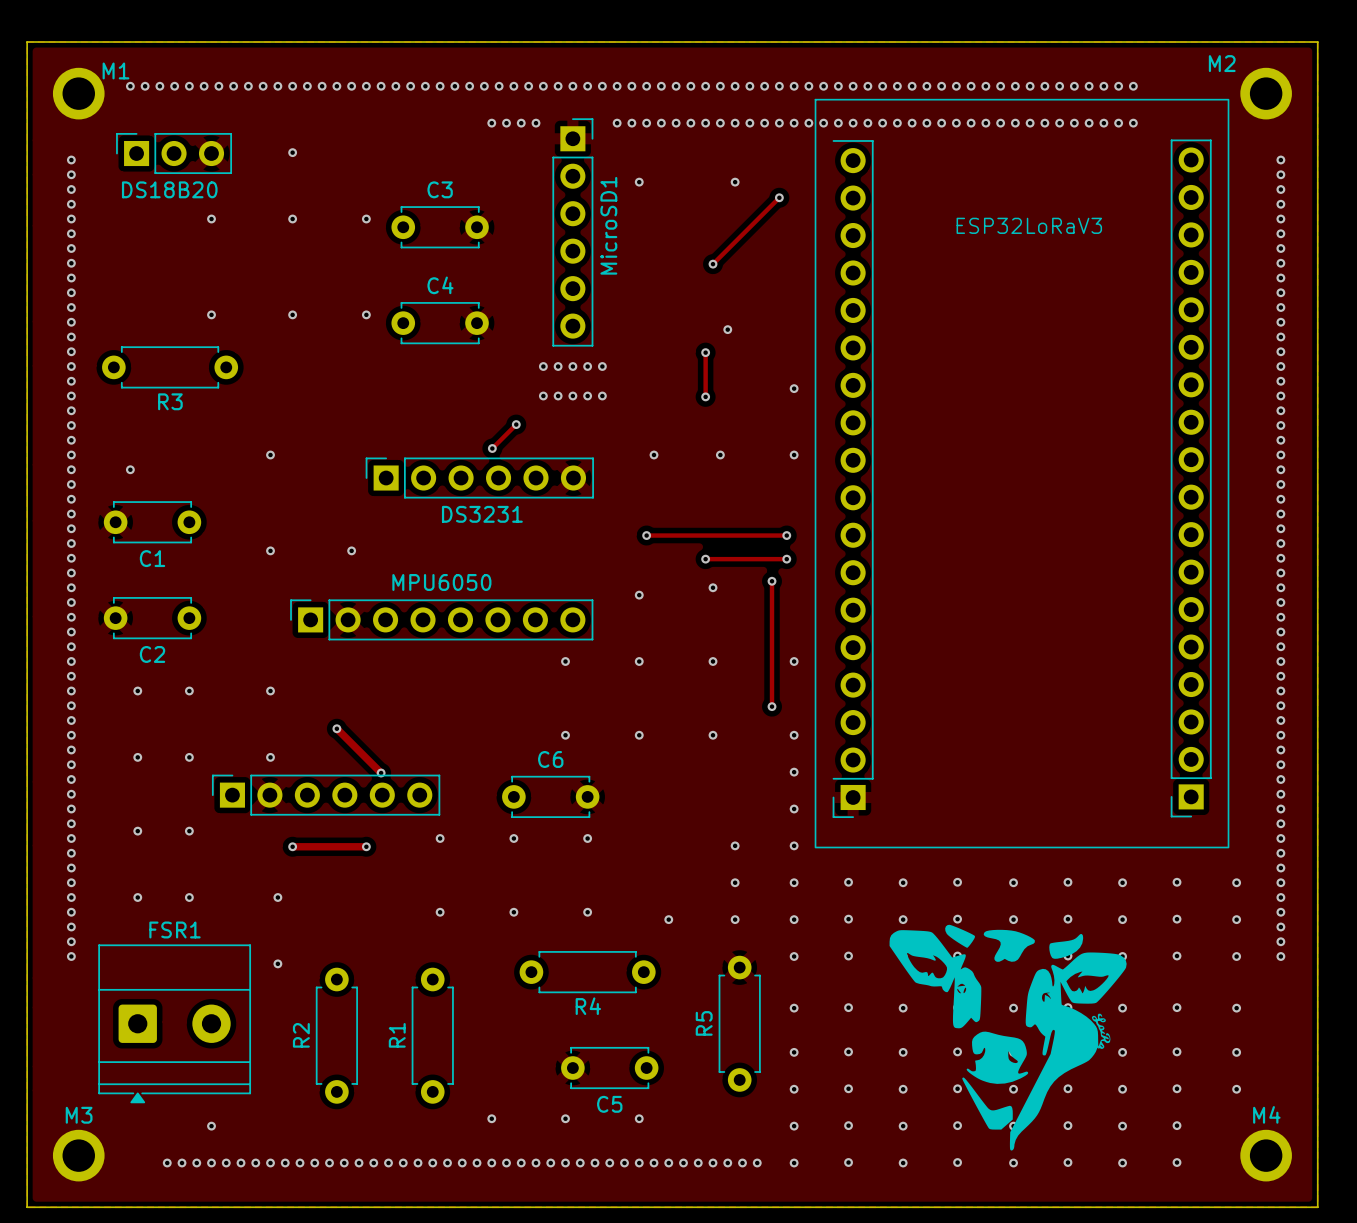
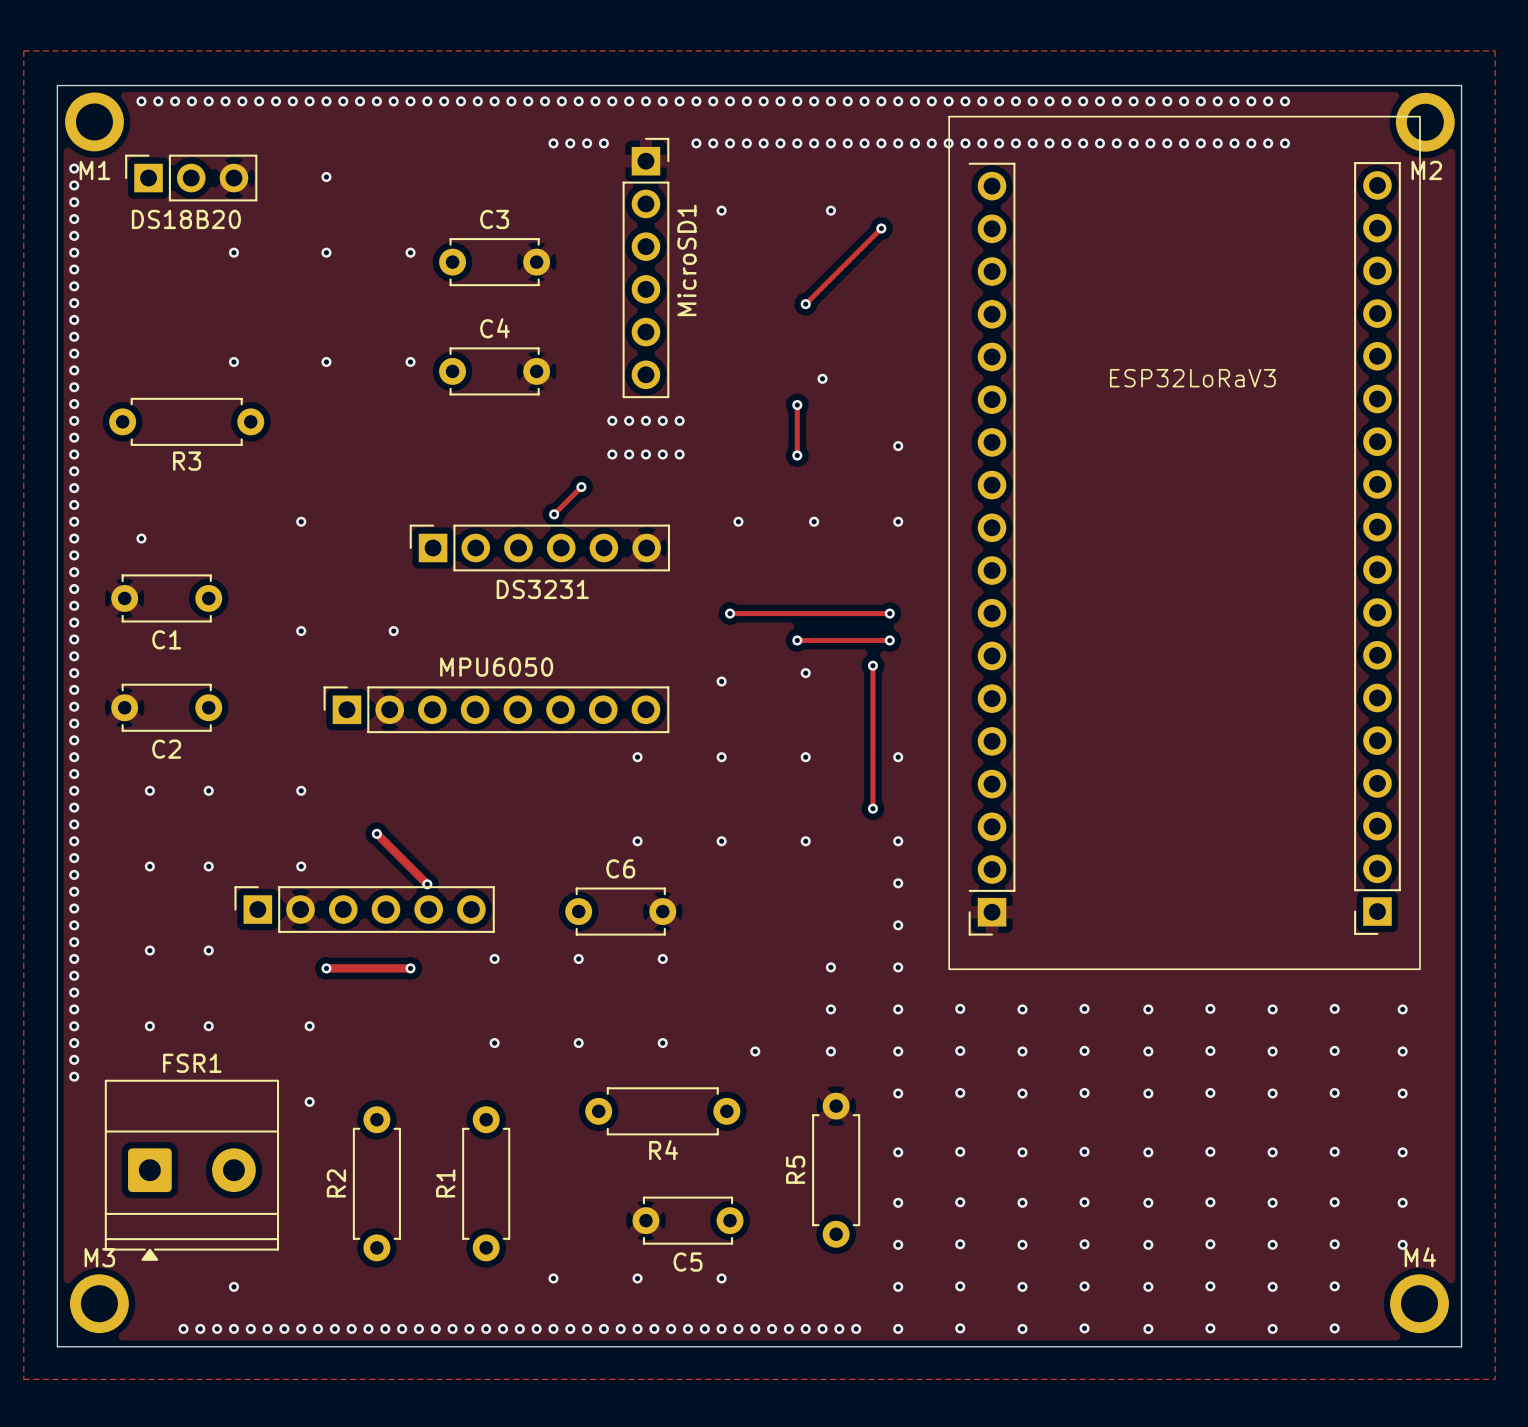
board edge: (27, 42) (1317, 42) (1317, 1207) (27, 1207) (27, 42) -> (57, 85) (57, 1346) (1461, 1346) (1461, 85) (57, 85)
M2 name position: M2 (1222, 63) -> M2 (1426, 170)
M1 name position: M1 (115, 70) -> M1 (94, 170)
M1 position: (78, 93) -> (94, 121)
M2 position: (1266, 93) -> (1425, 122)
via: none -> (74, 168)
via: (1280, 160) -> none
via: (1280, 174) -> none
via: (1280, 189) -> none
via: (1280, 204) -> none
via: (1280, 219) -> none
ESP32LoRaV3 name position: ESP32LoRaV3 (1029, 225) -> ESP32LoRaV3 (1192, 378)
via: (1280, 233) -> none
via: (1280, 248) -> none
via: (1280, 263) -> none
via: (1280, 278) -> none
via: (1280, 292) -> none
via: (1280, 307) -> none
via: (1280, 322) -> none
via: (1280, 337) -> none
via: (1280, 351) -> none
via: (1280, 366) -> none
via: (1280, 381) -> none
via: (1280, 396) -> none
via: (1280, 410) -> none
via: (1280, 425) -> none
via: (1280, 440) -> none
via: (1280, 455) -> none
via: (1280, 469) -> none
ESP32LoRaV3 position: (1022, 473) -> (1184, 542)
via: (1280, 484) -> none
via: (1280, 499) -> none
via: (1280, 514) -> none
via: (1280, 528) -> none
via: (1280, 543) -> none
via: (1280, 558) -> none
via: (1280, 573) -> none
via: (1280, 587) -> none
via: (1280, 602) -> none
via: (1280, 617) -> none
via: (1280, 632) -> none
via: (1280, 646) -> none
via: (1280, 661) -> none
via: (1280, 676) -> none
via: (1280, 691) -> none
via: (1280, 705) -> none
via: (1280, 720) -> none
via: (1280, 735) -> none
via: (1280, 750) -> none
via: (1280, 764) -> none
via: (1280, 779) -> none
via: (1280, 794) -> none
via: (1280, 809) -> none
via: (1280, 823) -> none
via: (1280, 838) -> none
via: (1280, 853) -> none
via: (1280, 868) -> none
via: (1280, 882) -> none
via: (1280, 897) -> none
via: (1280, 912) -> none
drawing: [889, 924, 1127, 1151] -> none
via: (1280, 927) -> none
via: (1280, 941) -> none
via: (71, 956) -> none
via: (1280, 956) -> none
M3 position: (78, 1155) -> (99, 1303)
M4 position: (1266, 1155) -> (1419, 1303)

